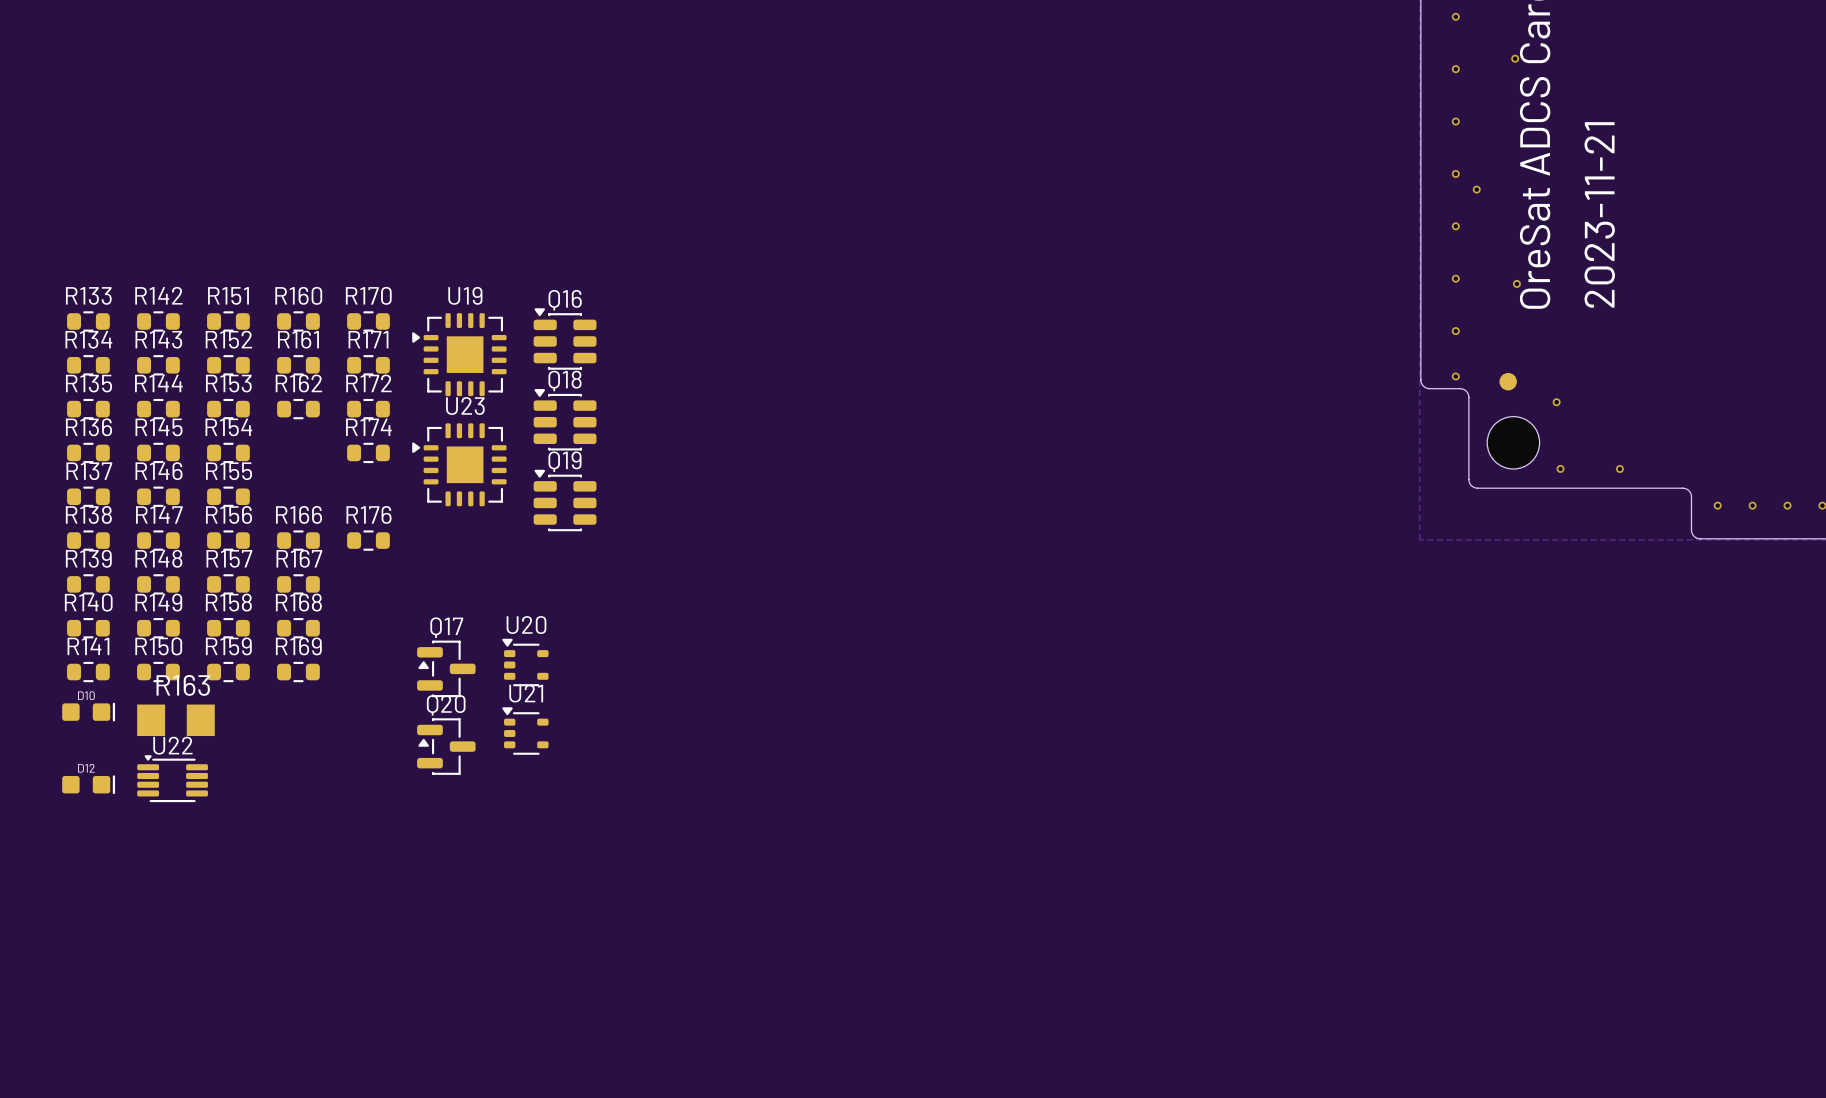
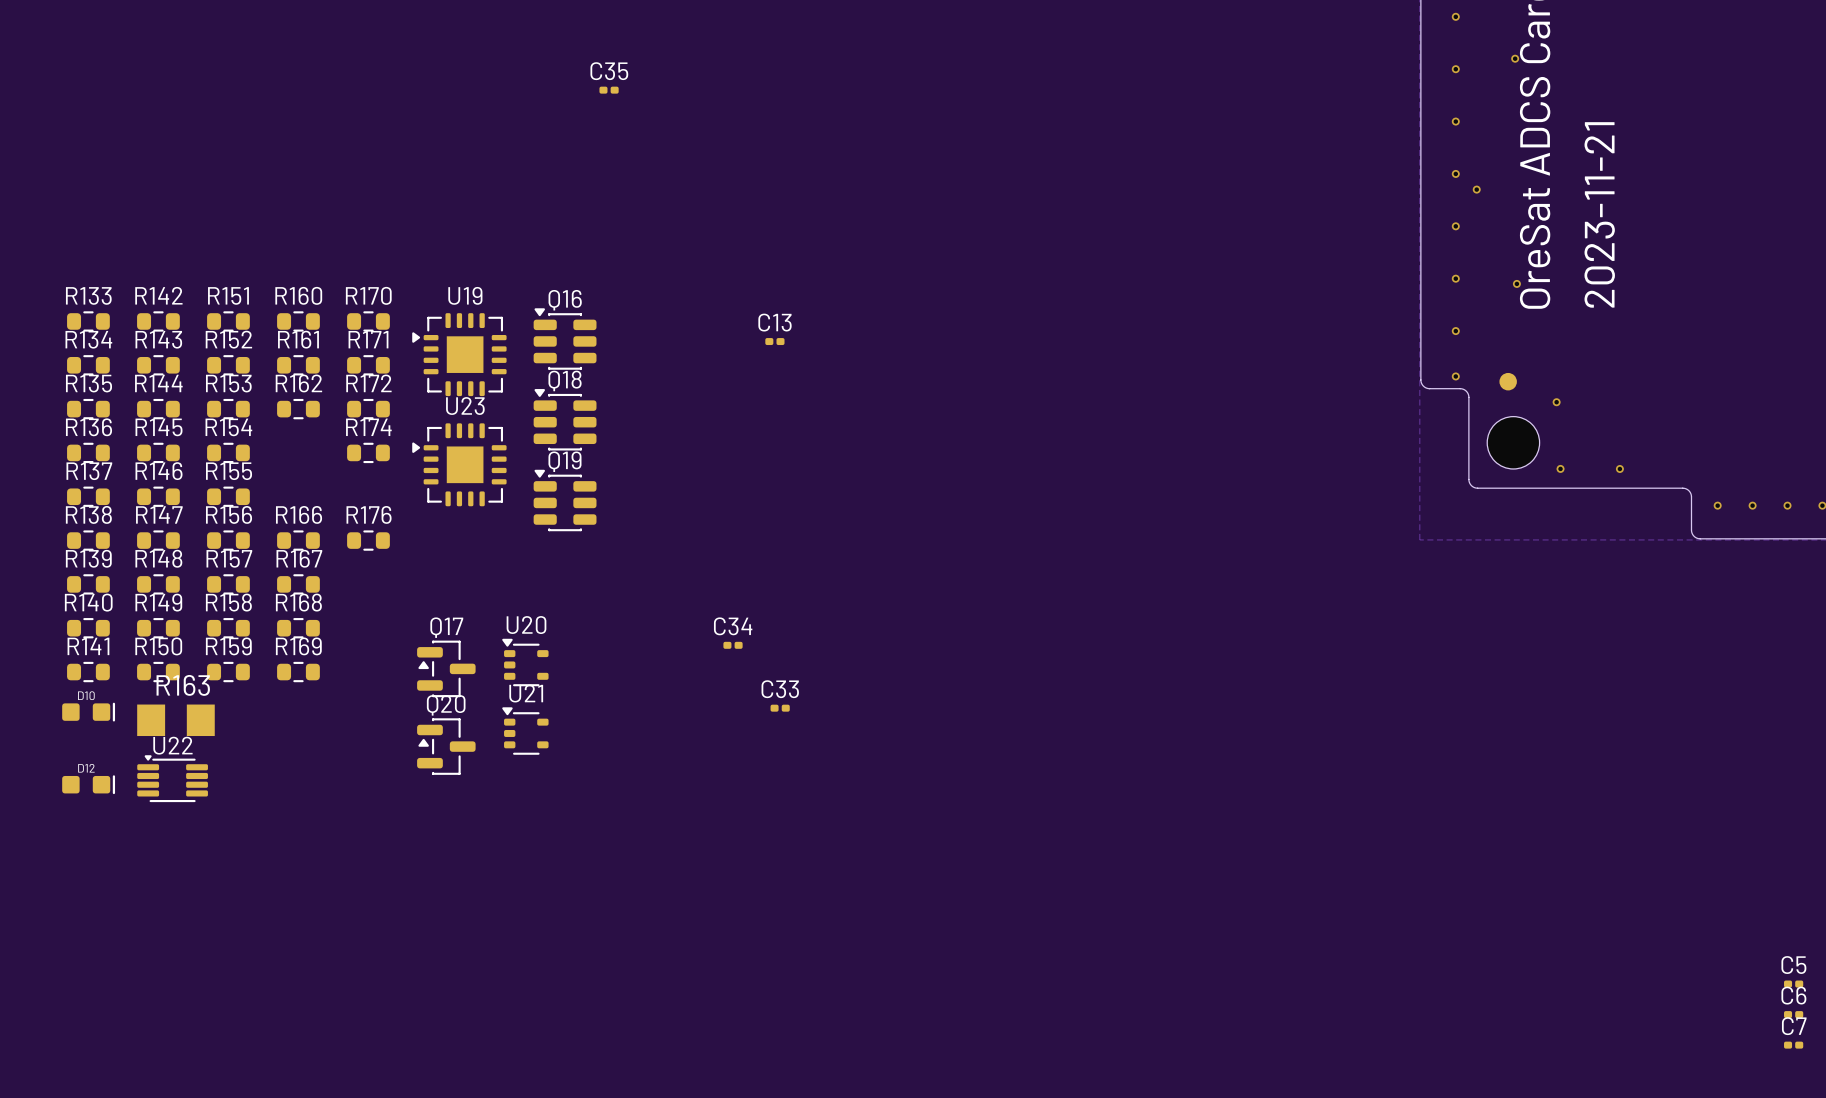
C35: none -> (609, 90)
C13: none -> (774, 341)
C34: none -> (733, 645)
C33: none -> (780, 708)
C5: none -> (1793, 984)
C6: none -> (1793, 1014)
C7: none -> (1793, 1045)

